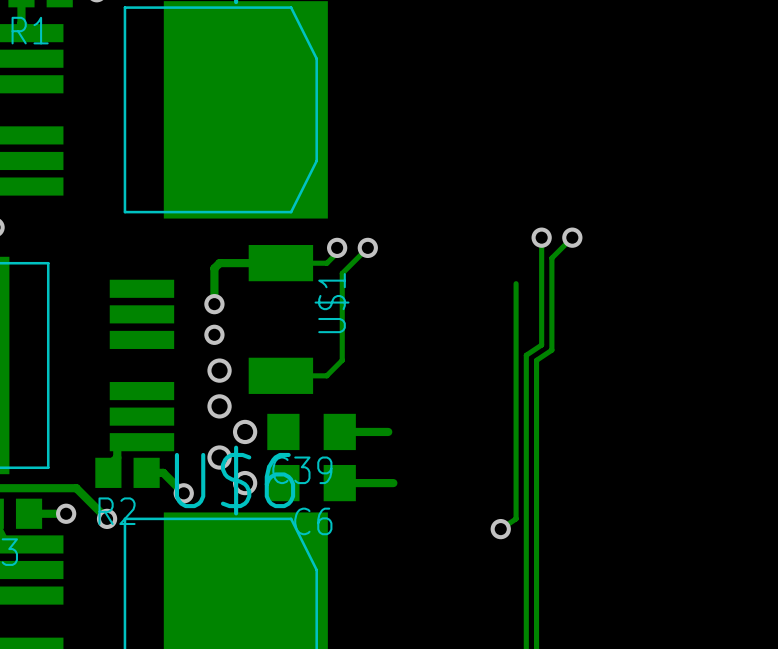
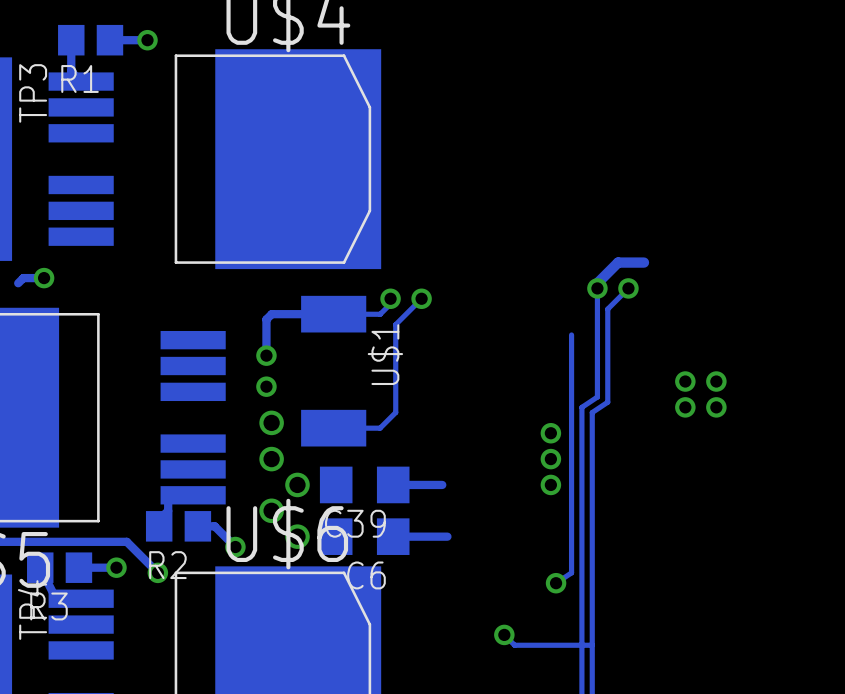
track: none -> (643, 262) (618, 262) (597, 283) (597, 288)
via: none -> (685, 381)
via: none -> (716, 381)
via: none -> (685, 407)
via: none -> (716, 407)
via: none -> (550, 433)
via: none -> (550, 459)
via: none -> (550, 484)
track: none -> (504, 634) (514, 645) (592, 645)
via: none -> (504, 634)

